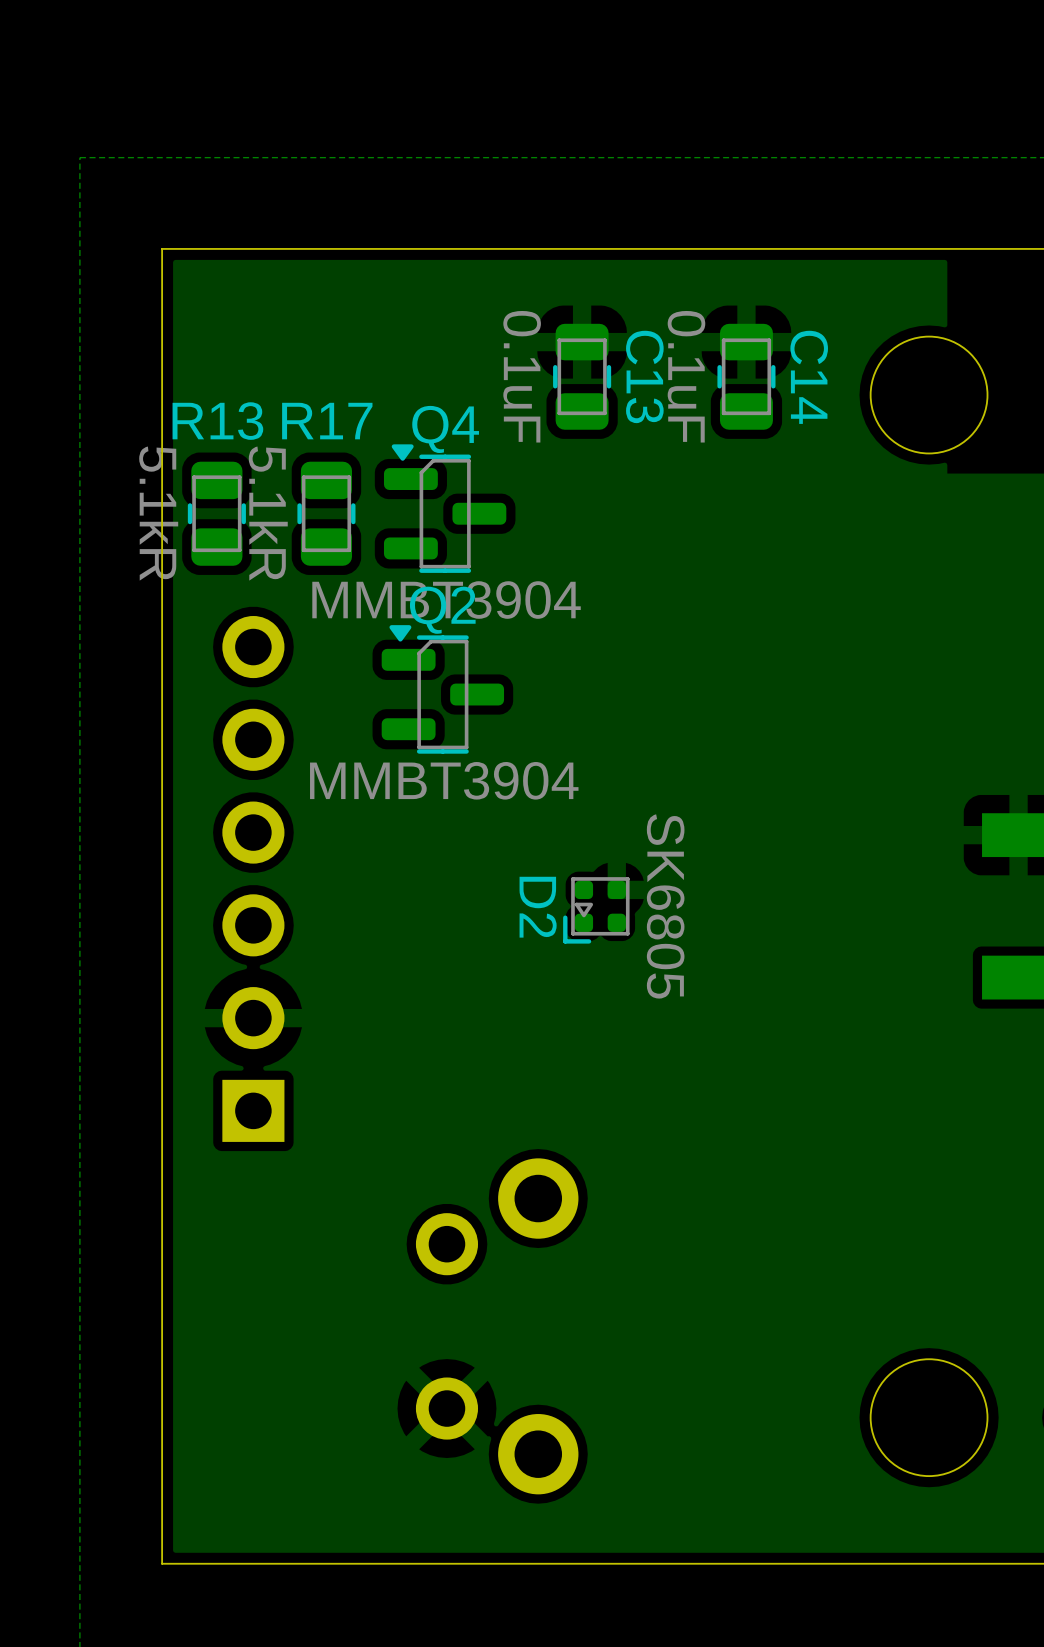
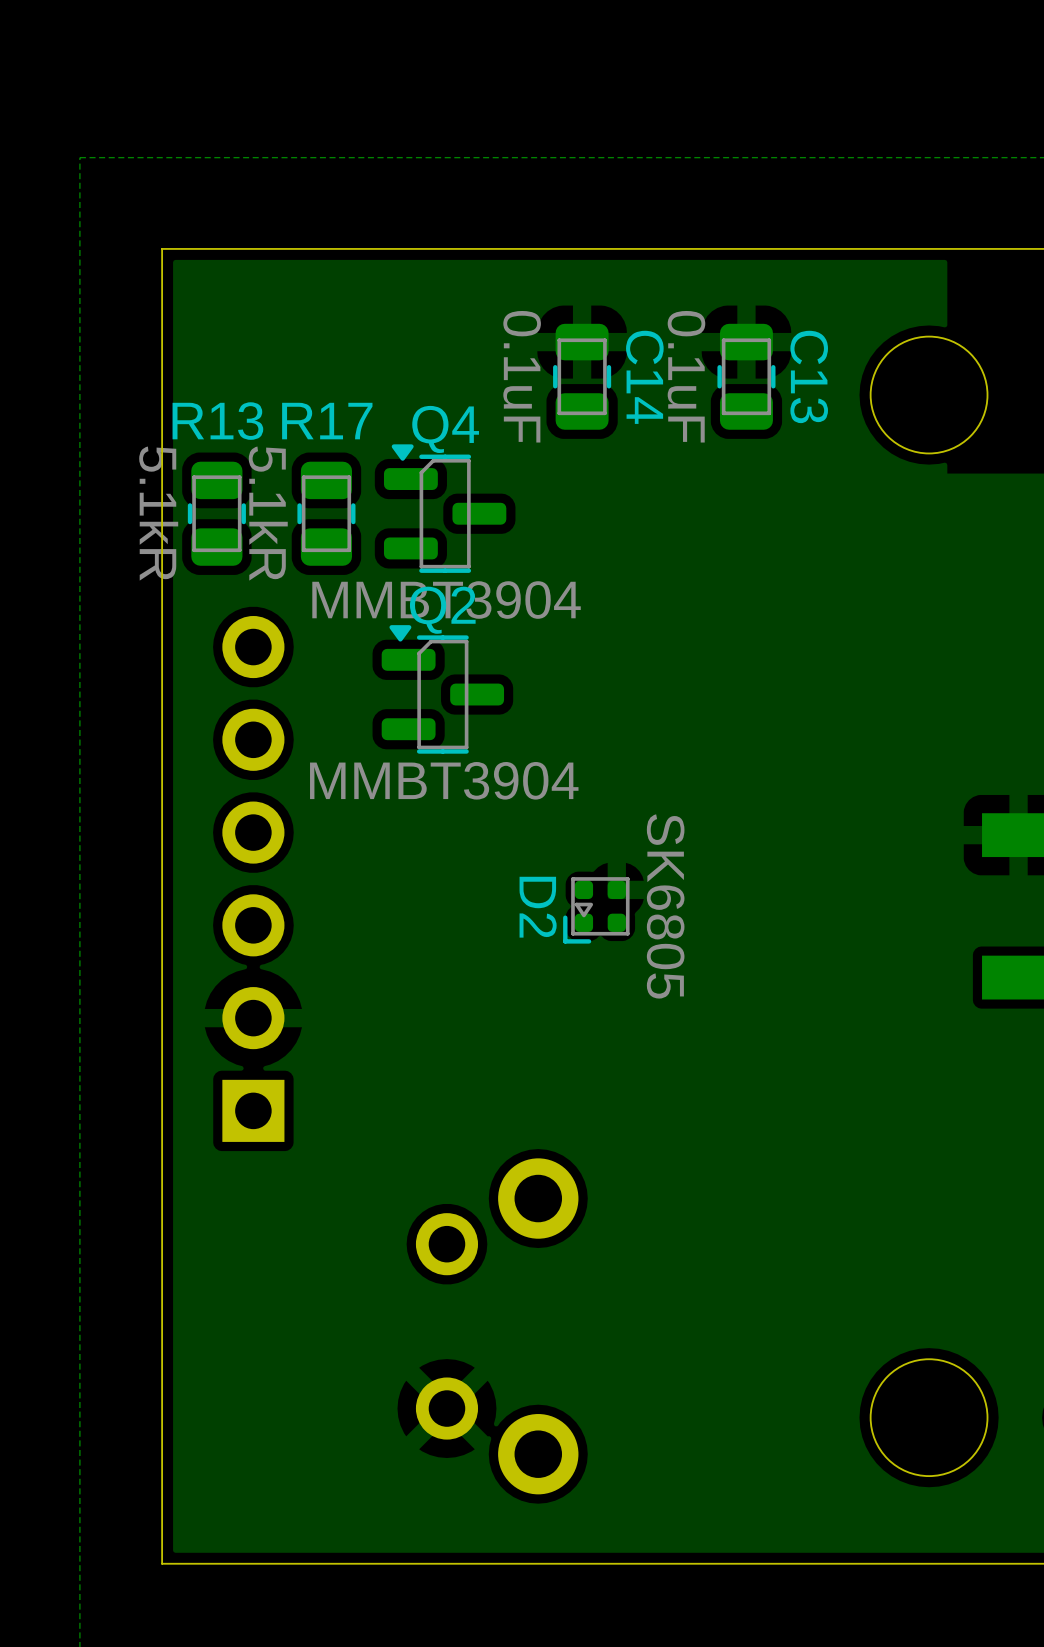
C13 name: C13 (644, 376) -> C14 (644, 377)
C14 name: C14 (809, 377) -> C13 (809, 376)

